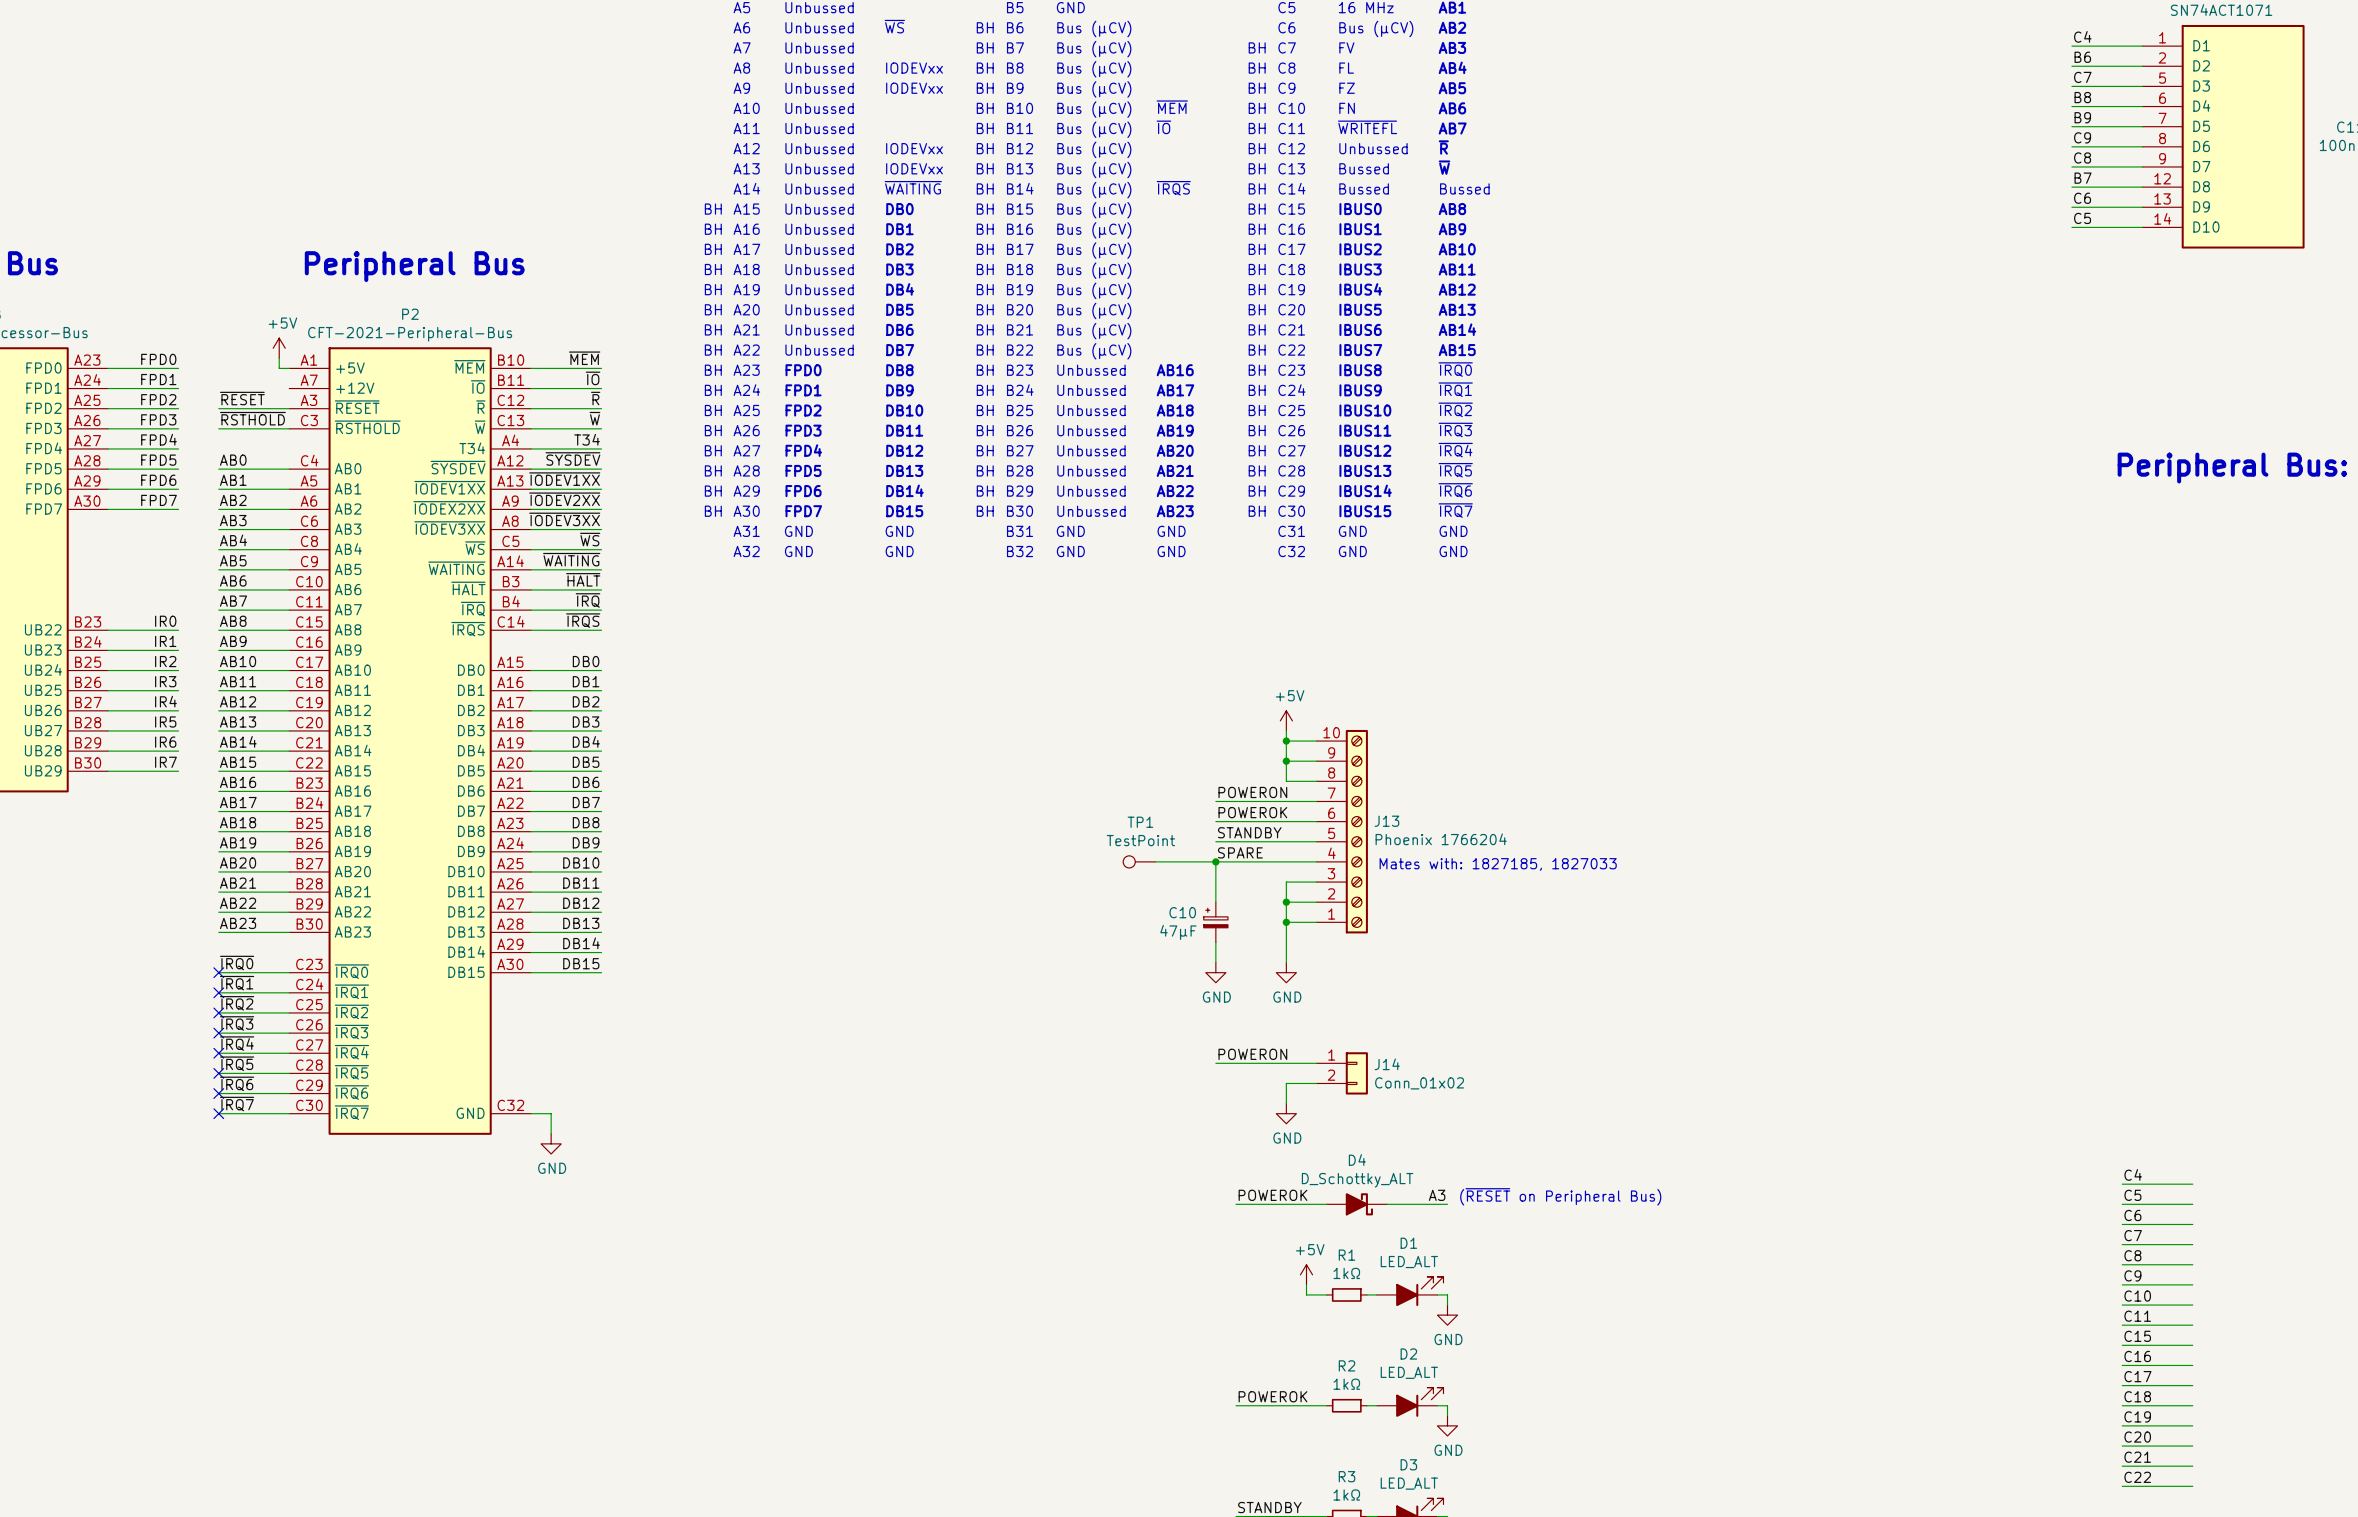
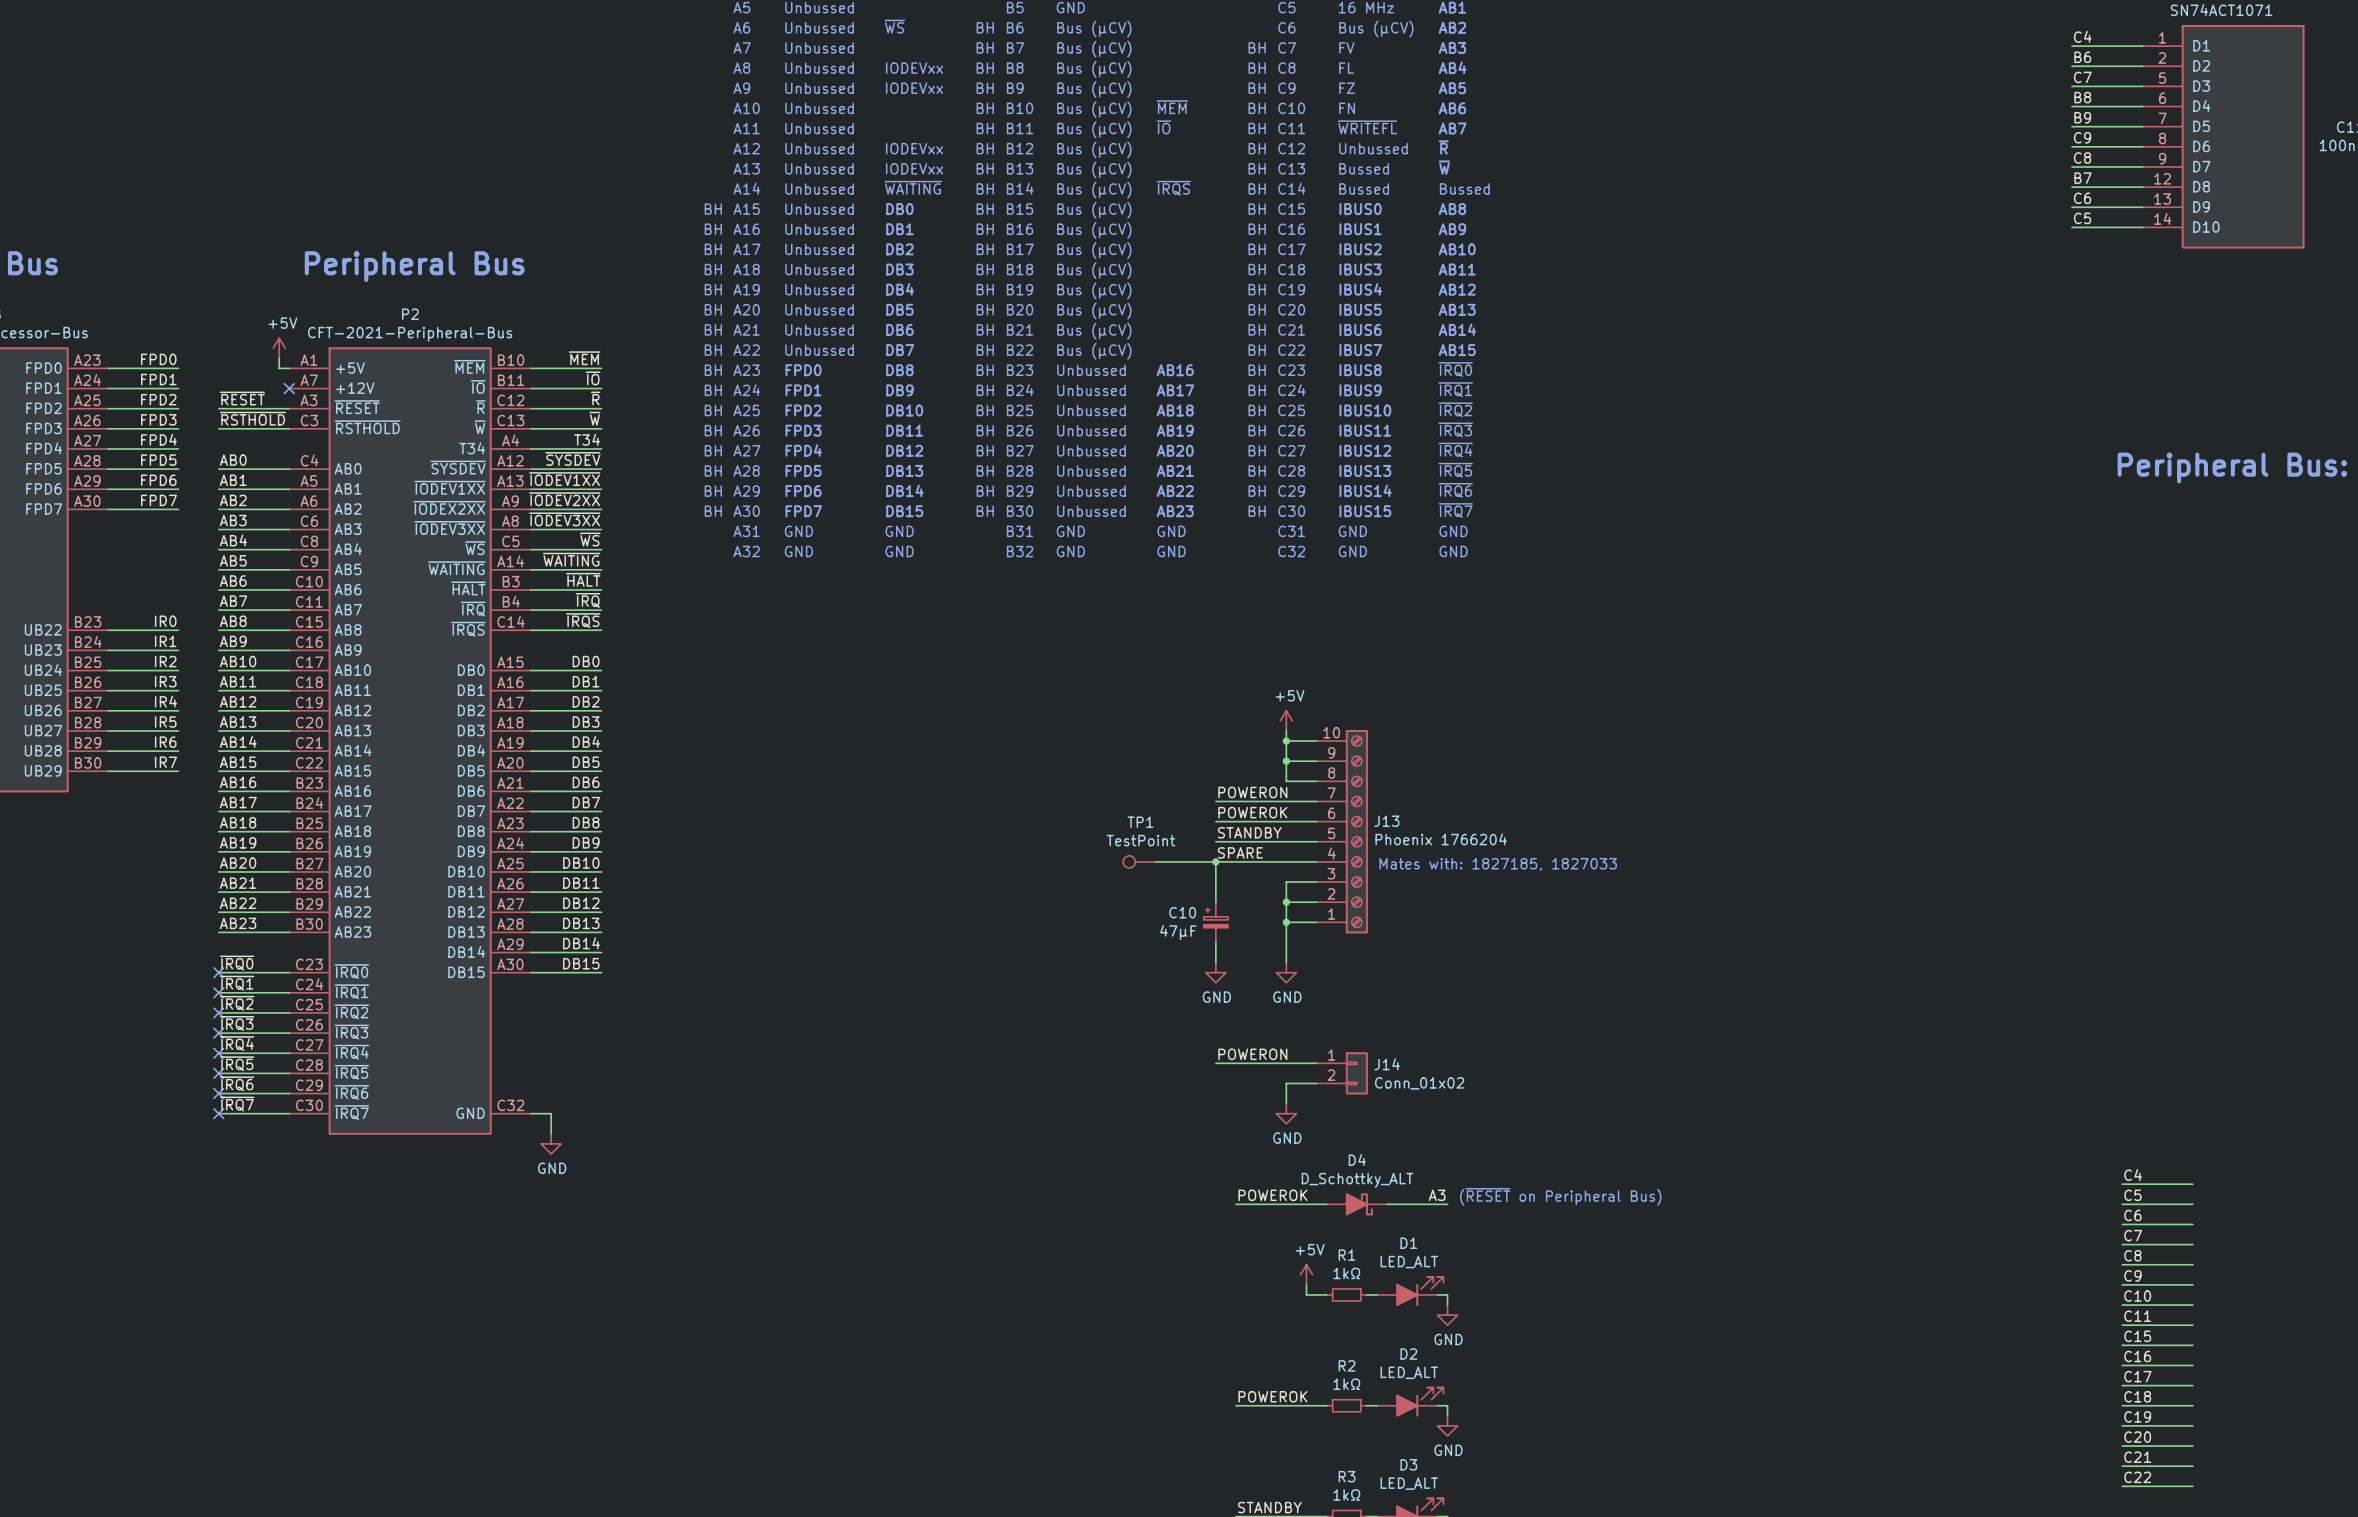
no-connect mark: none -> (289, 388)

